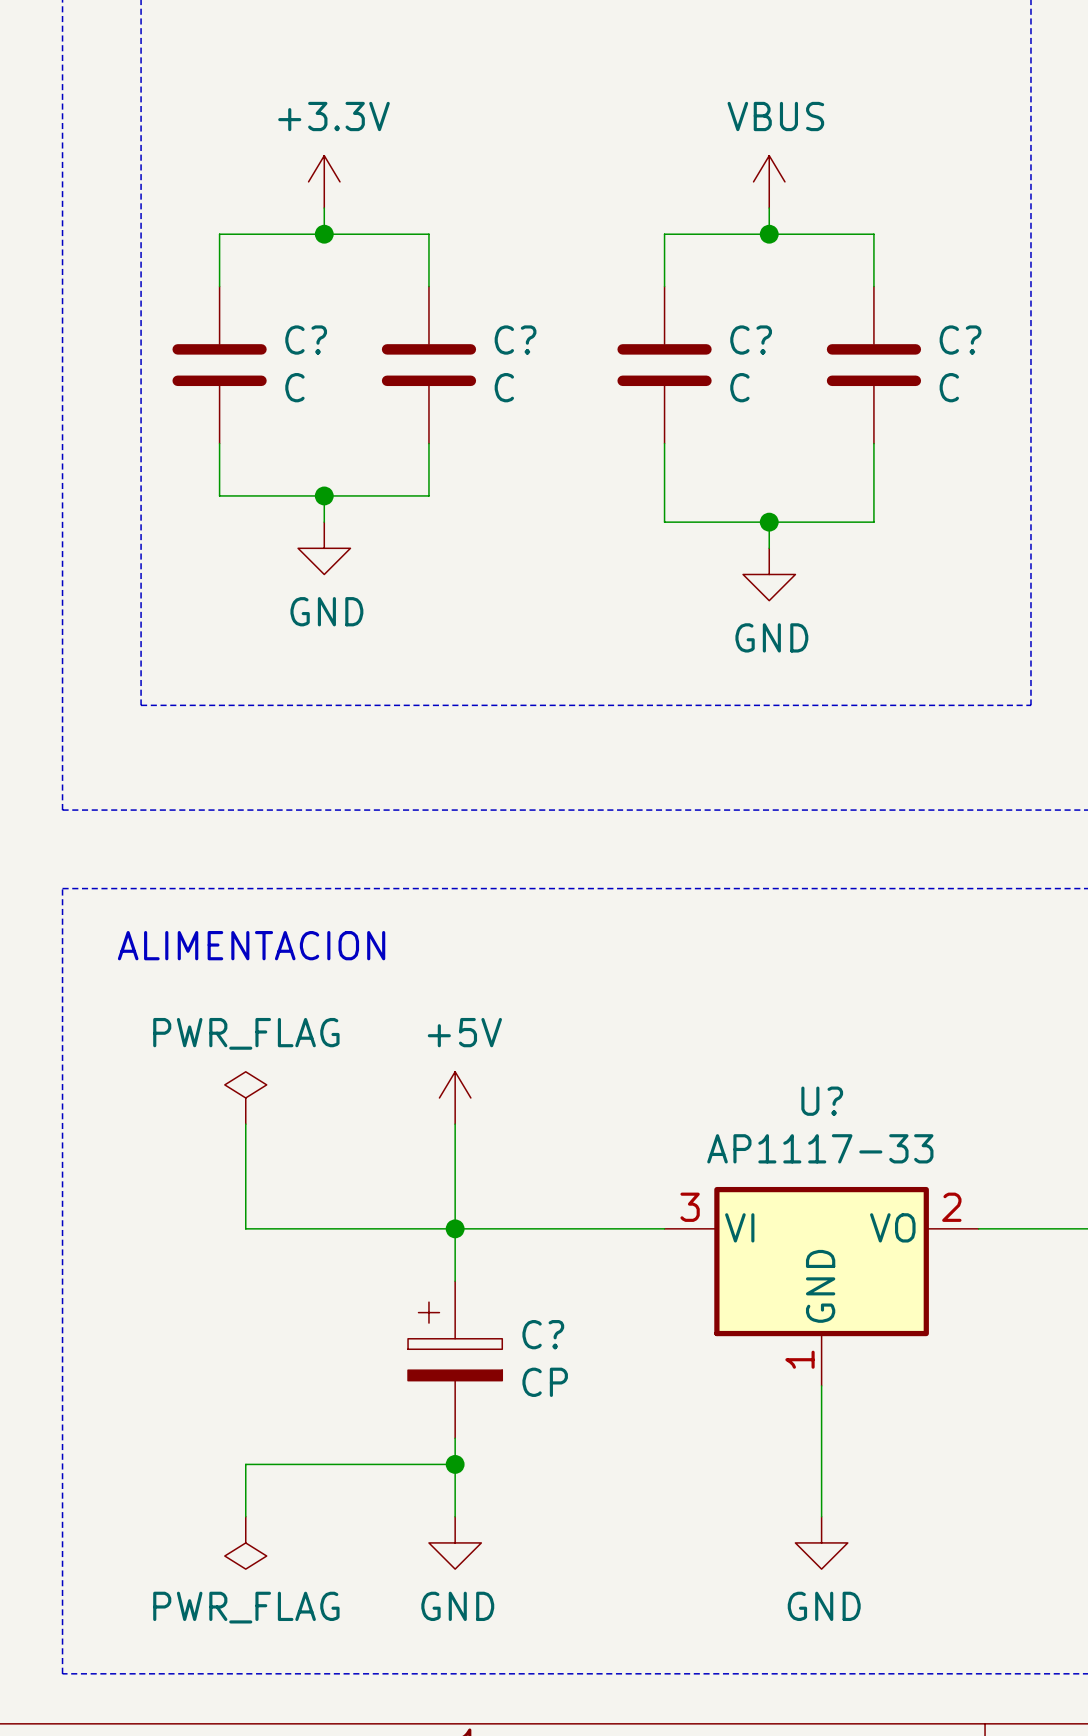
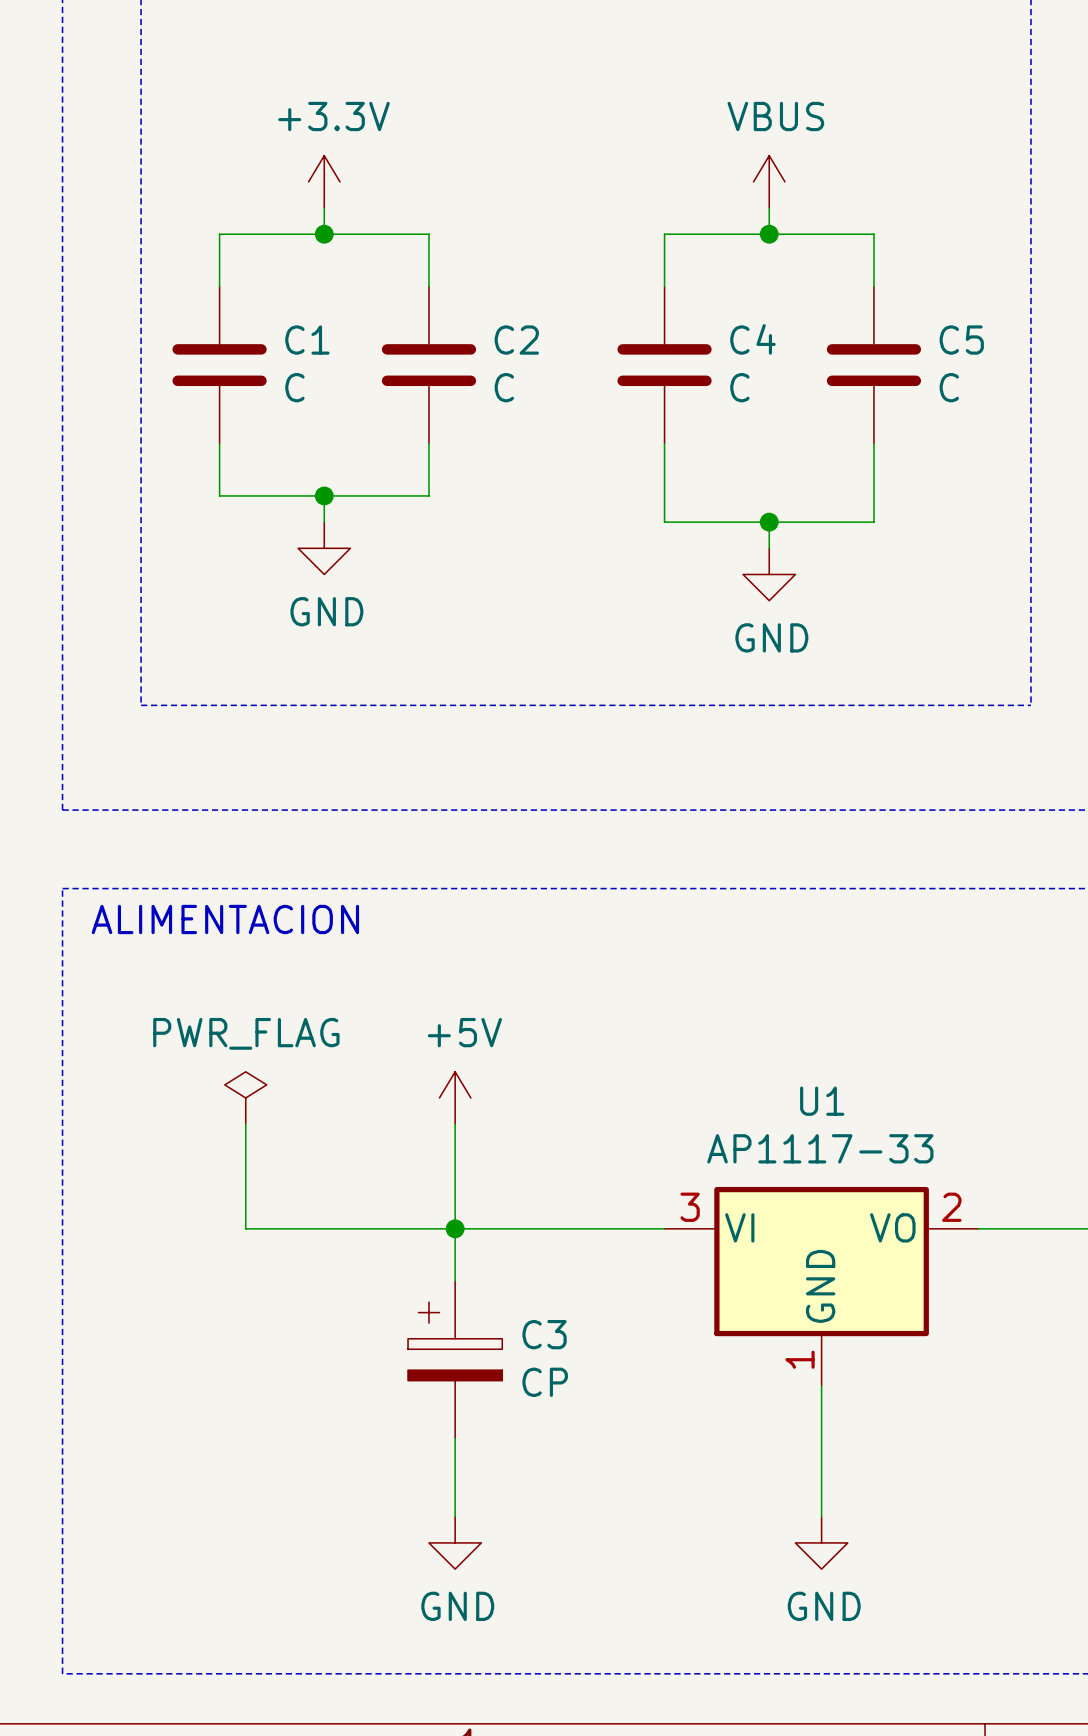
C? name: C? (306, 340) -> C1 (307, 340)
C? name: C? (515, 340) -> C2 (516, 340)
C? name: C? (751, 340) -> C4 (752, 339)
C? name: C? (960, 340) -> C5 (961, 340)
text position: ALIMENTACION (251, 945) -> ALIMENTACION (225, 919)
U? name: U? (822, 1101) -> U1 (822, 1101)
C? name: C? (543, 1334) -> C3 (544, 1334)
wire: (455, 1464) (245, 1464) (245, 1516) -> none
junction: (455, 1464) -> none
power symbol: PWR_FLAG (245, 1542) -> none

